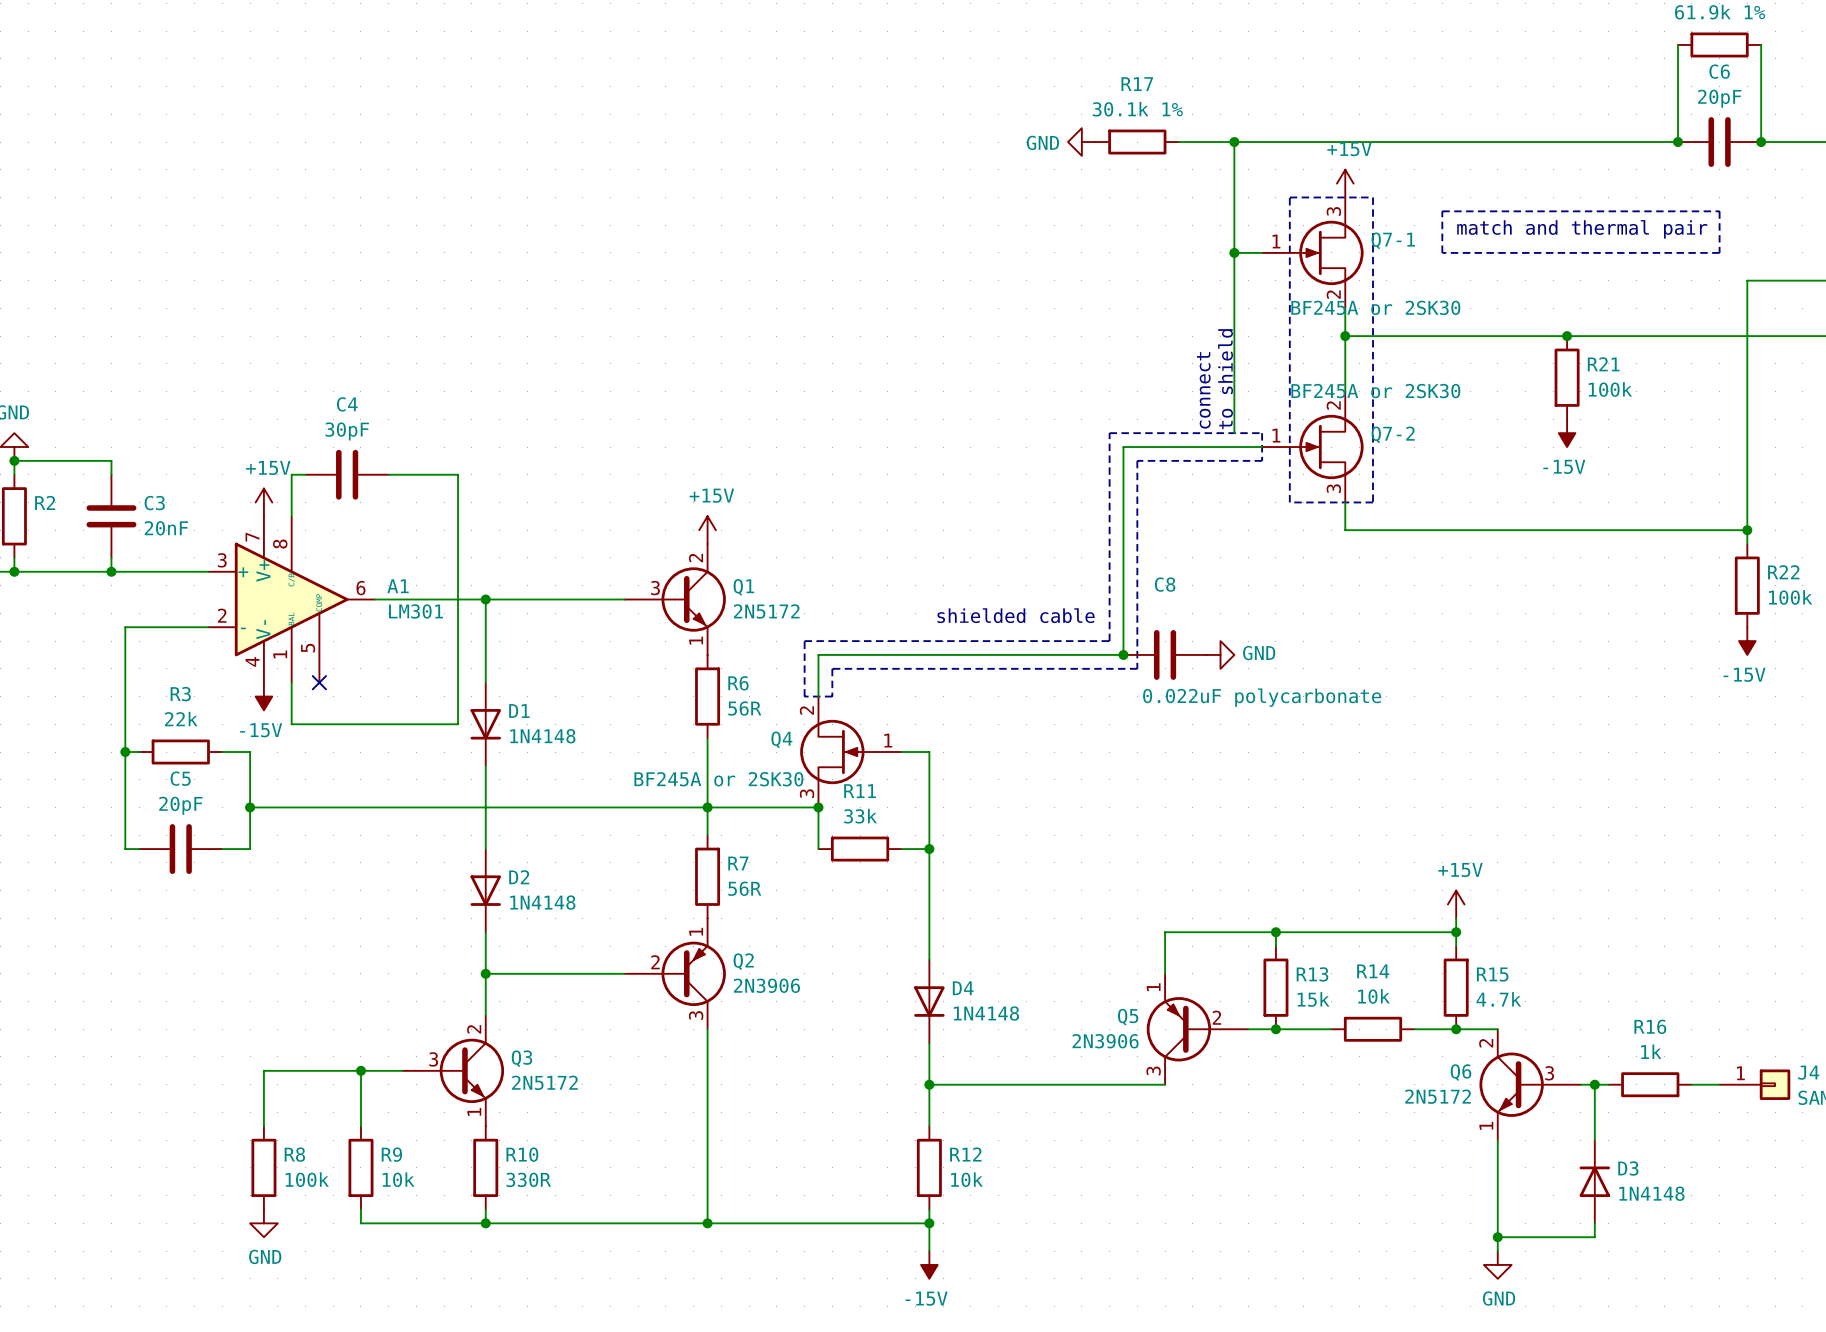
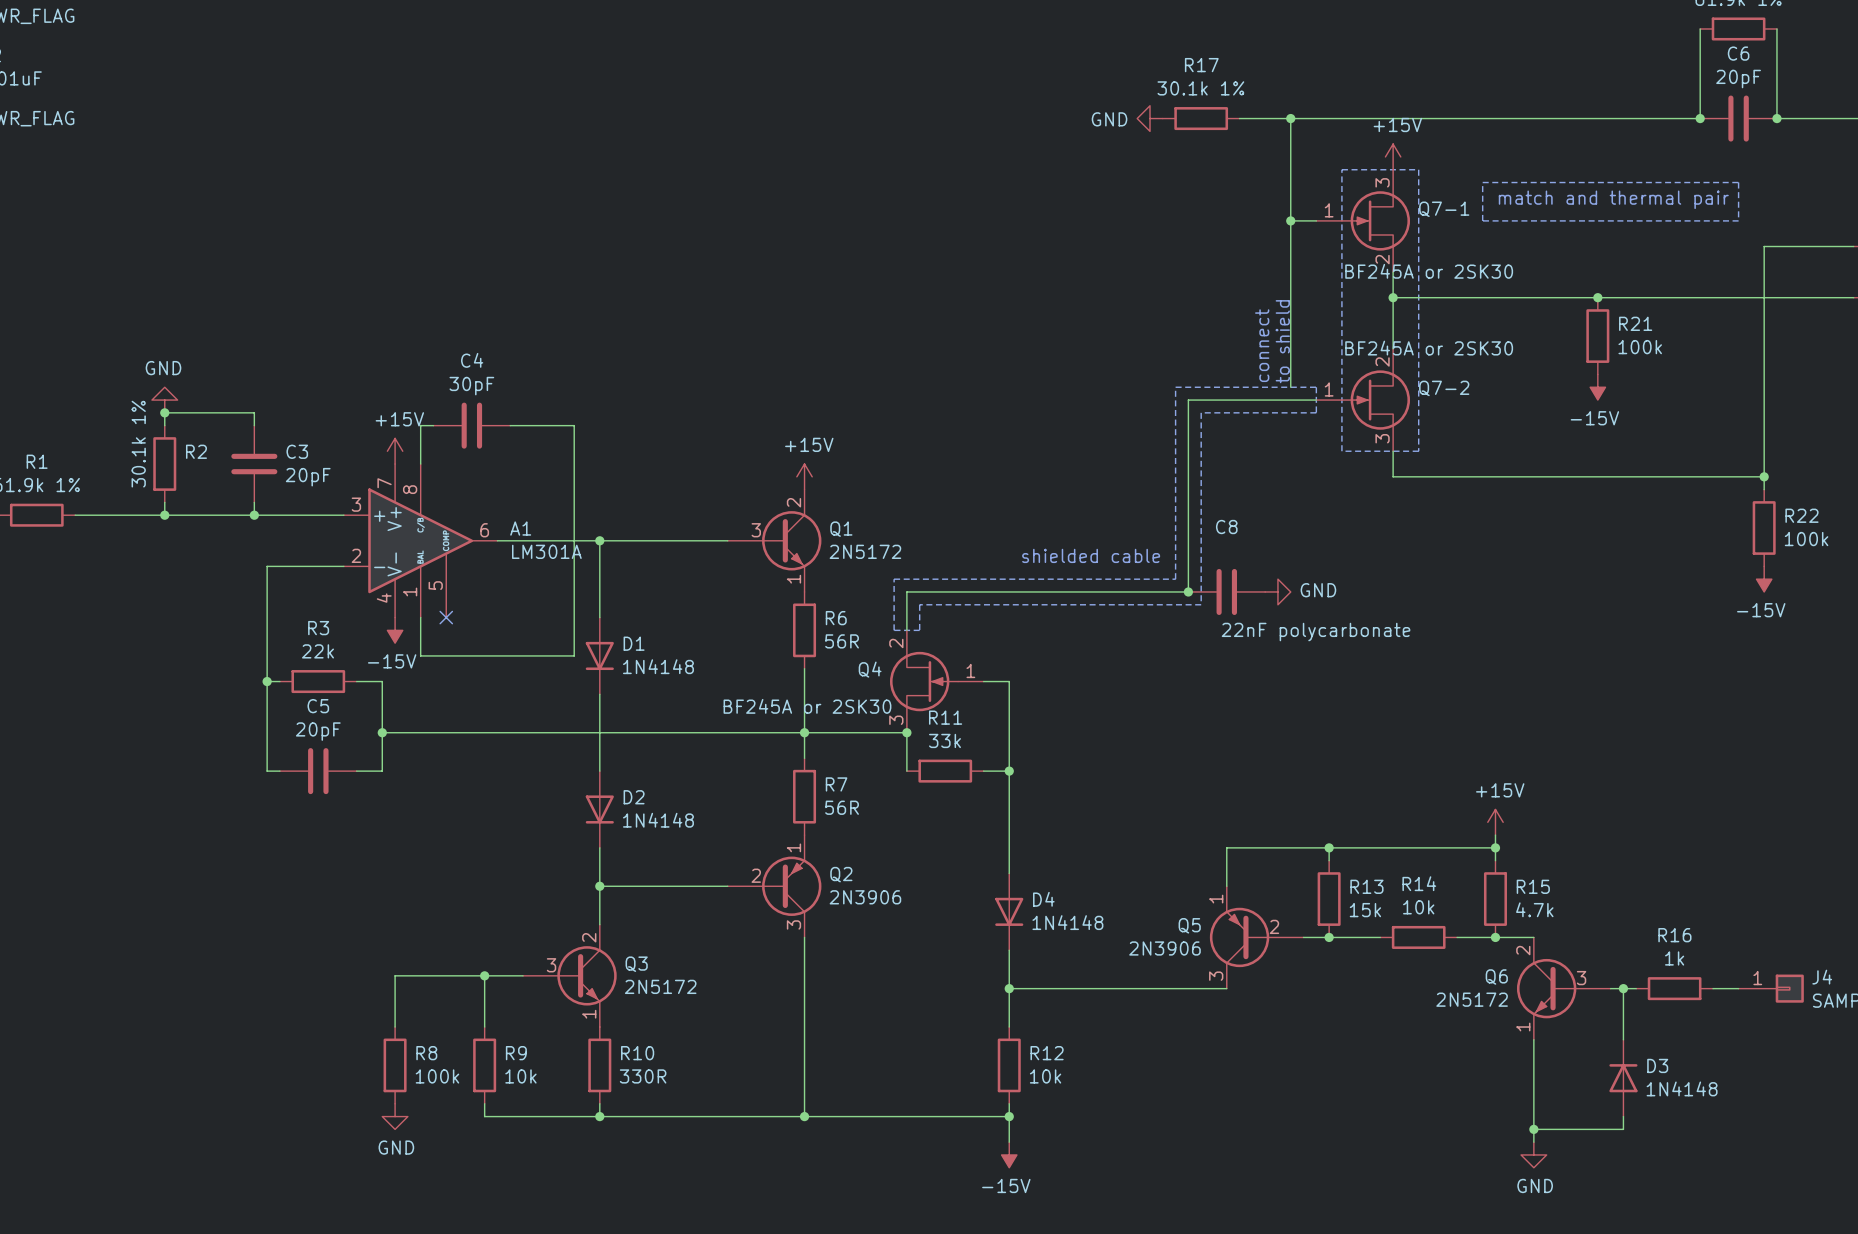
C3 value: 20nF (166, 528) -> 20pF (308, 477)
A1 value: LM301 (416, 611) -> LM301A (546, 551)
C8 value: 0.022uF polycarbonate (1262, 697) -> 22nF polycarbonate (1316, 632)

